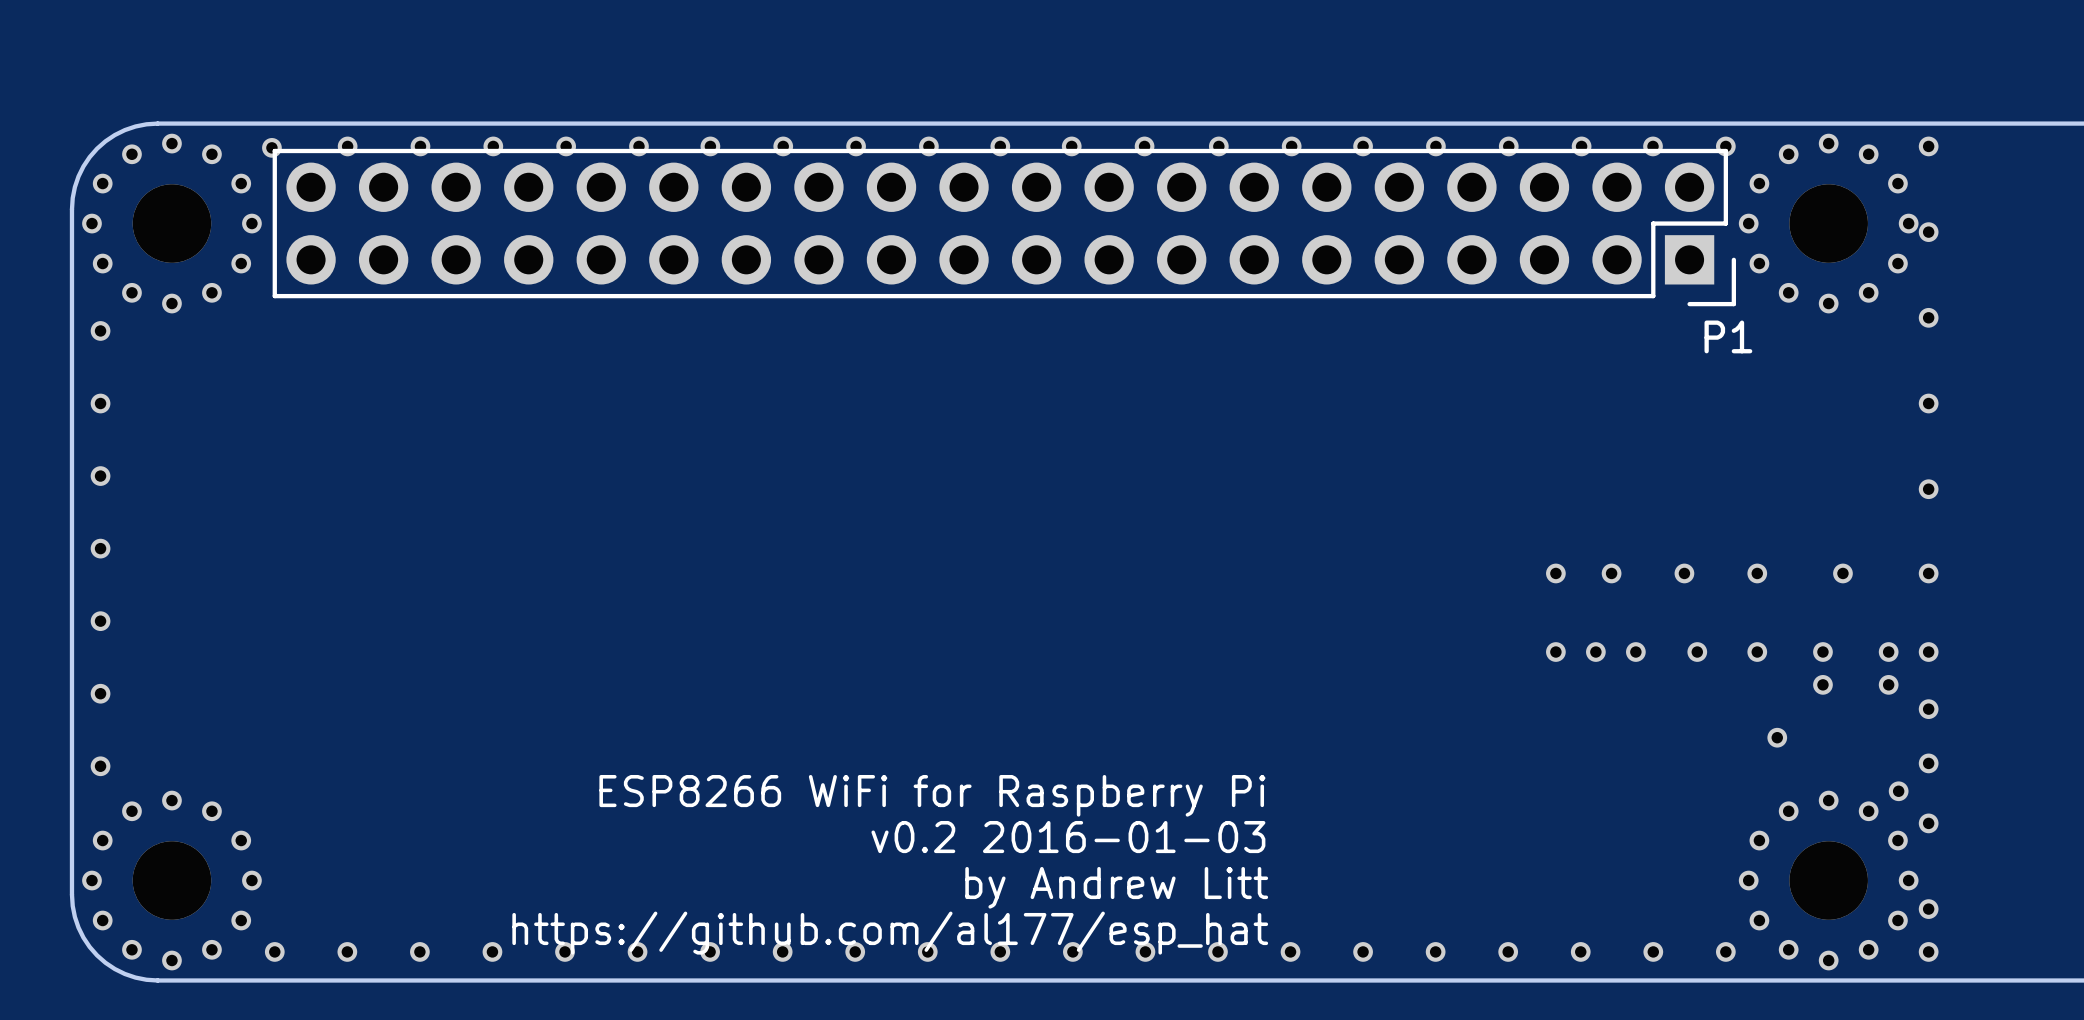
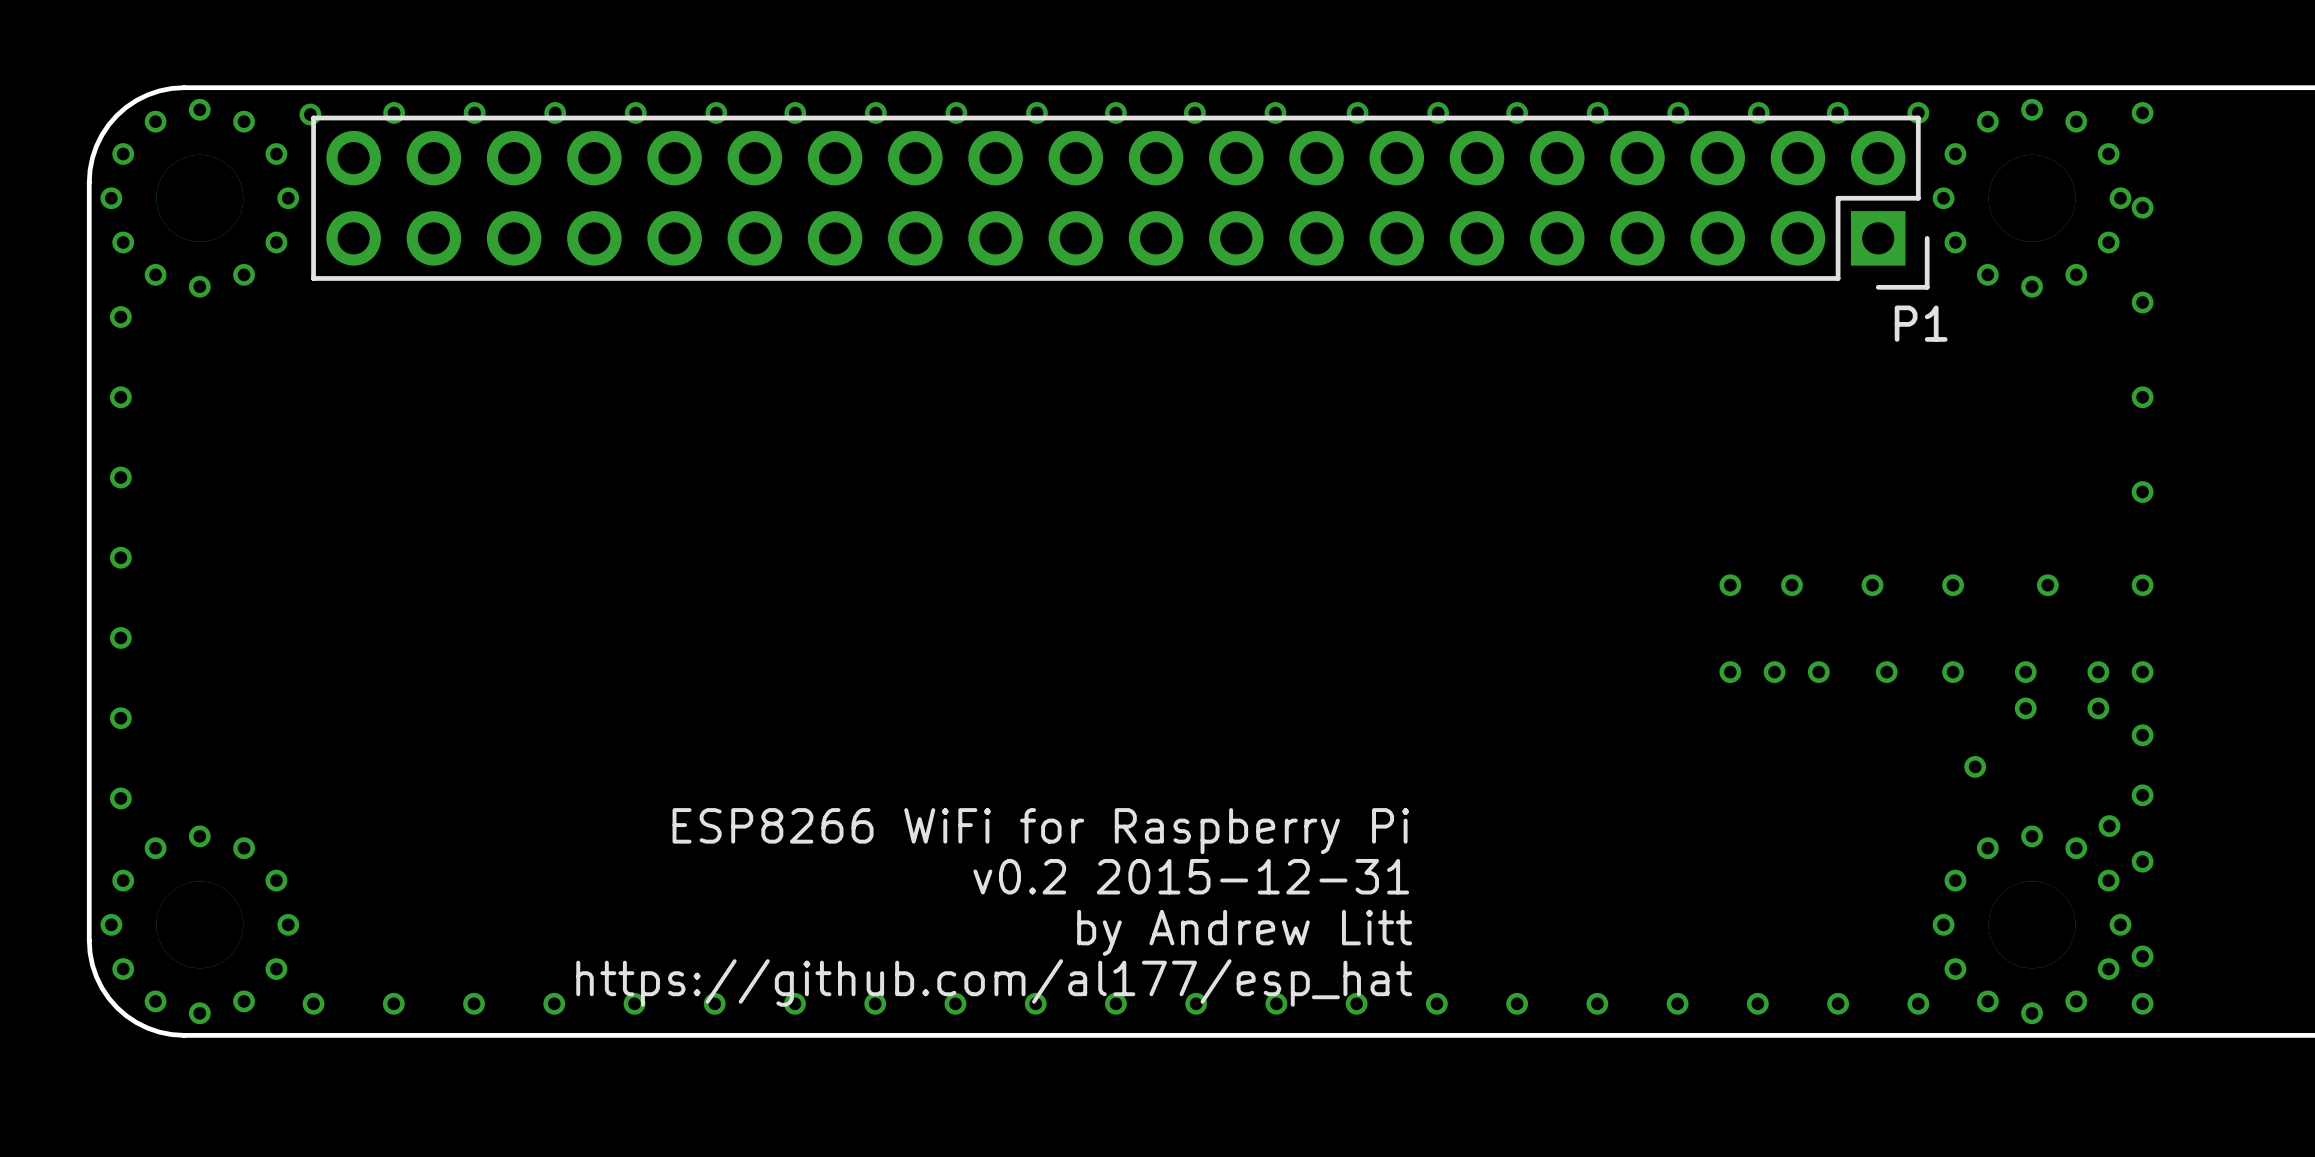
text: v0.2 2016-01-03 (1068, 837) -> v0.2 2015-12-31 (1191, 876)

